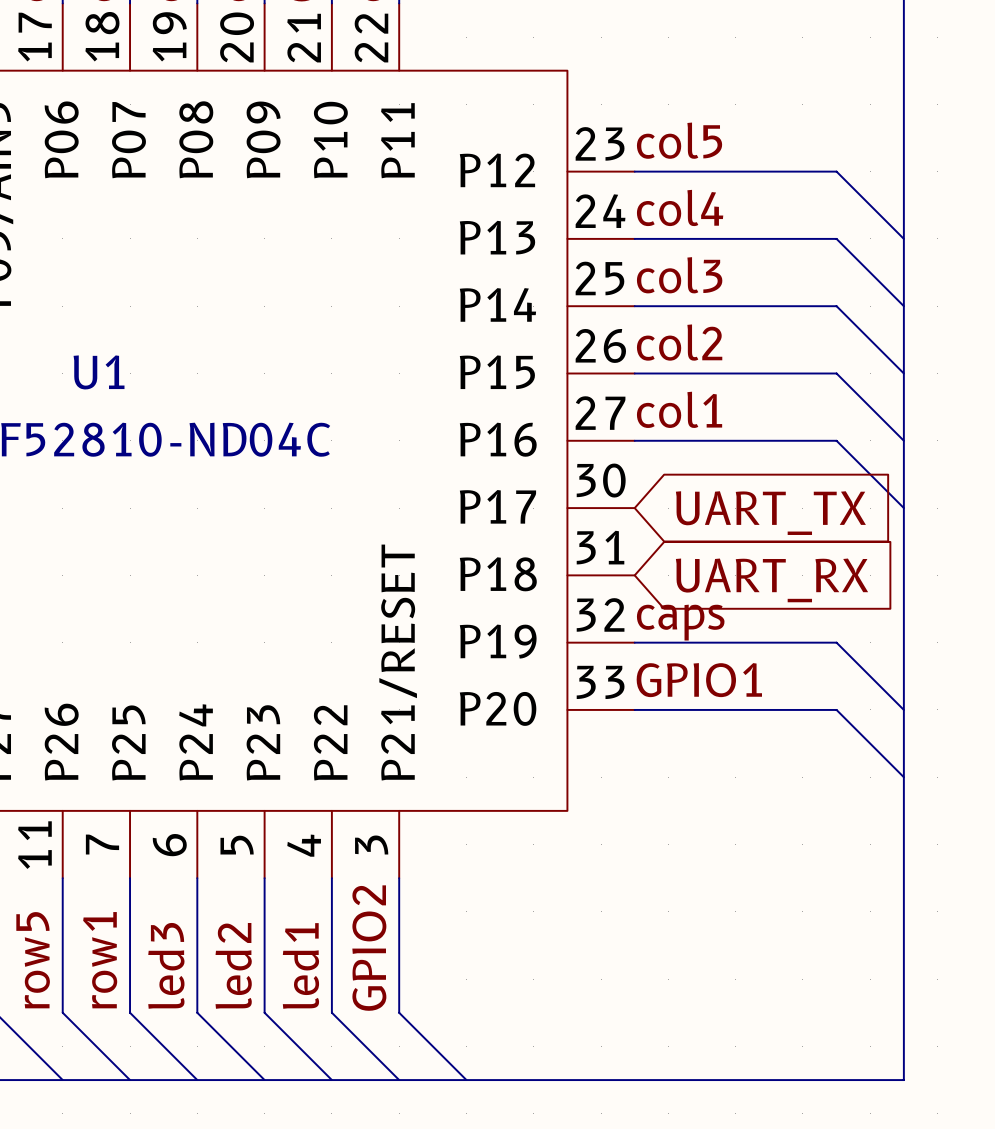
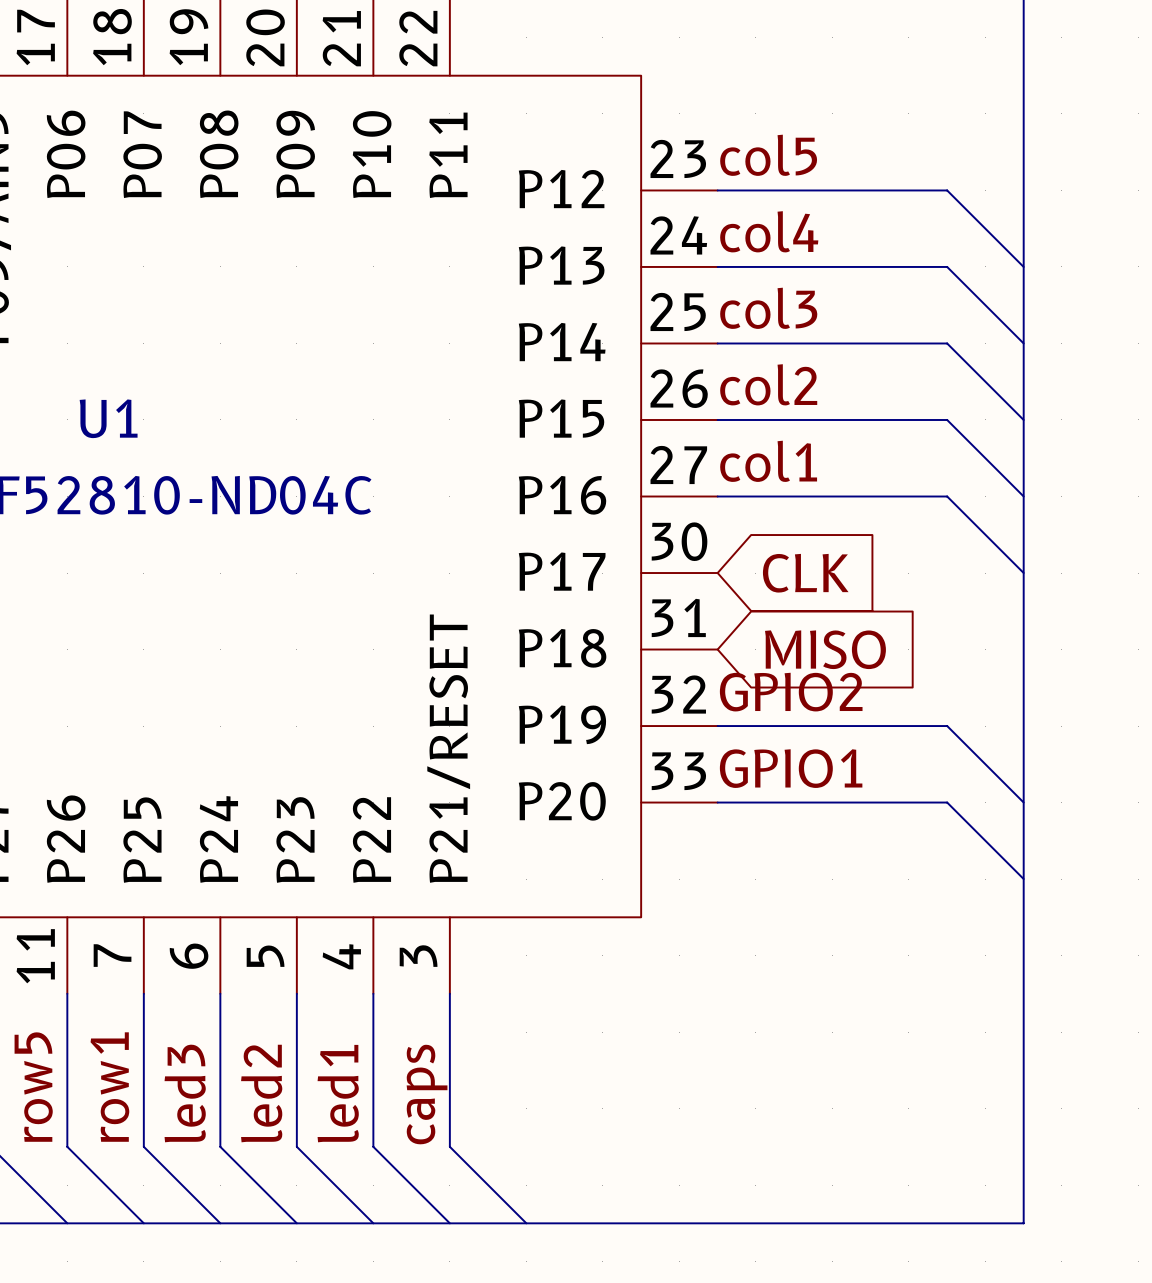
global label: UART_TX (770, 513) -> CLK (805, 573)
global label: UART_RX (772, 580) -> MISO (825, 649)
label: caps (680, 622) -> GPIO2 (791, 692)
label: GPIO2 (369, 948) -> caps (427, 1094)

